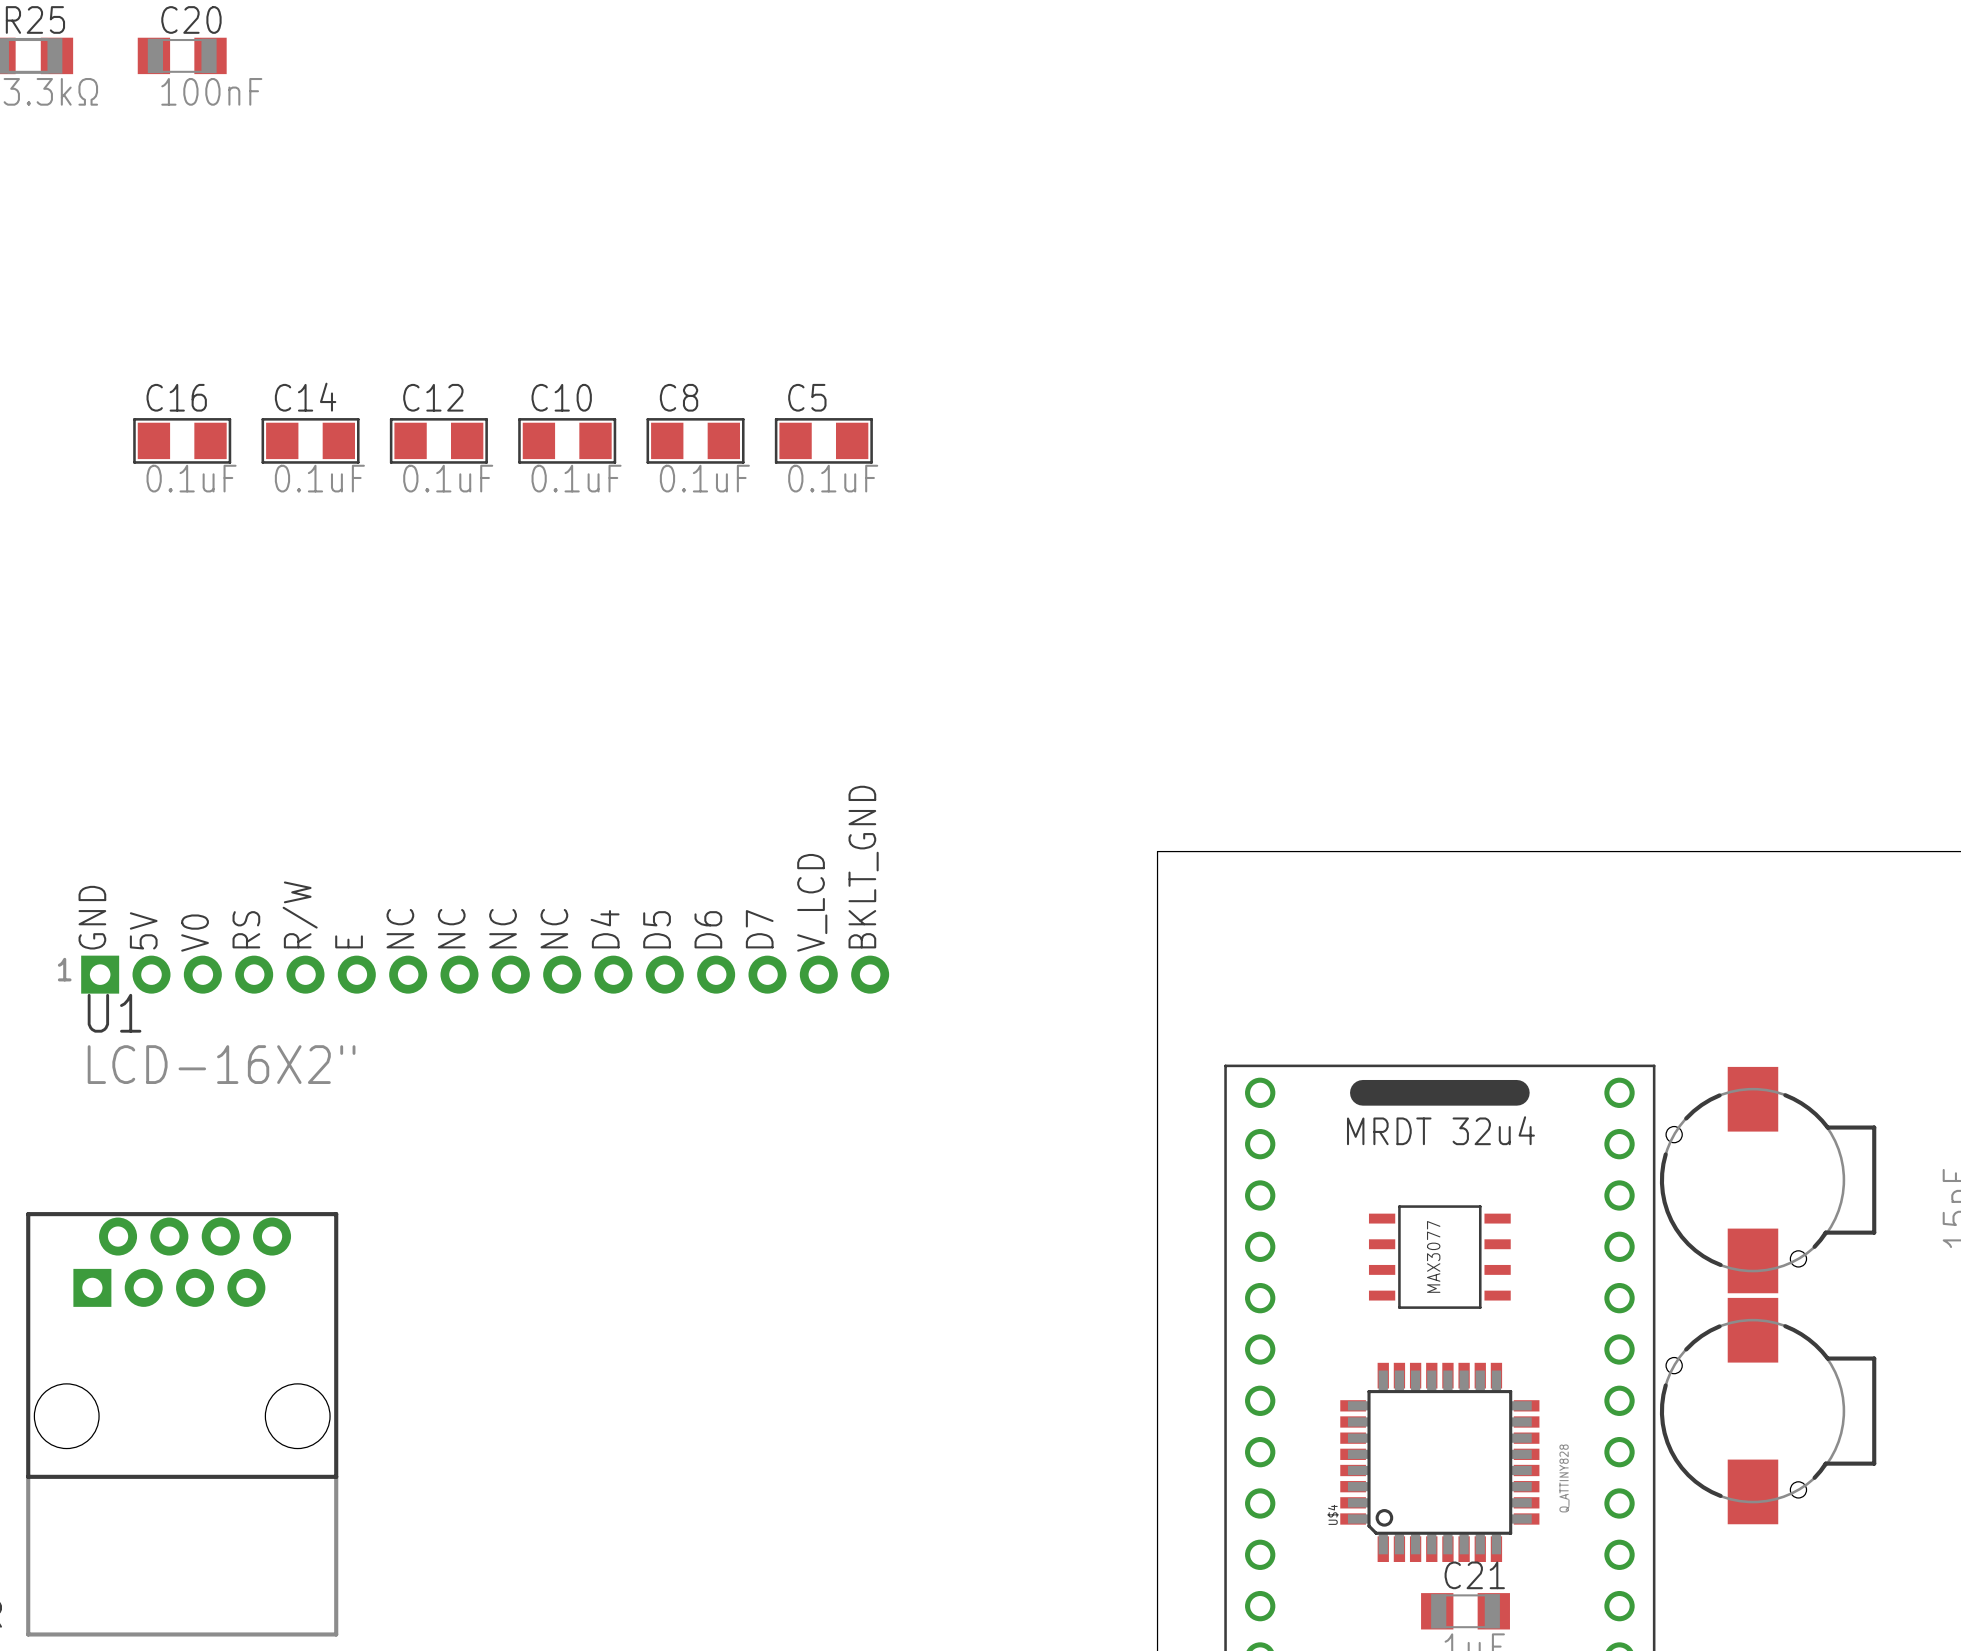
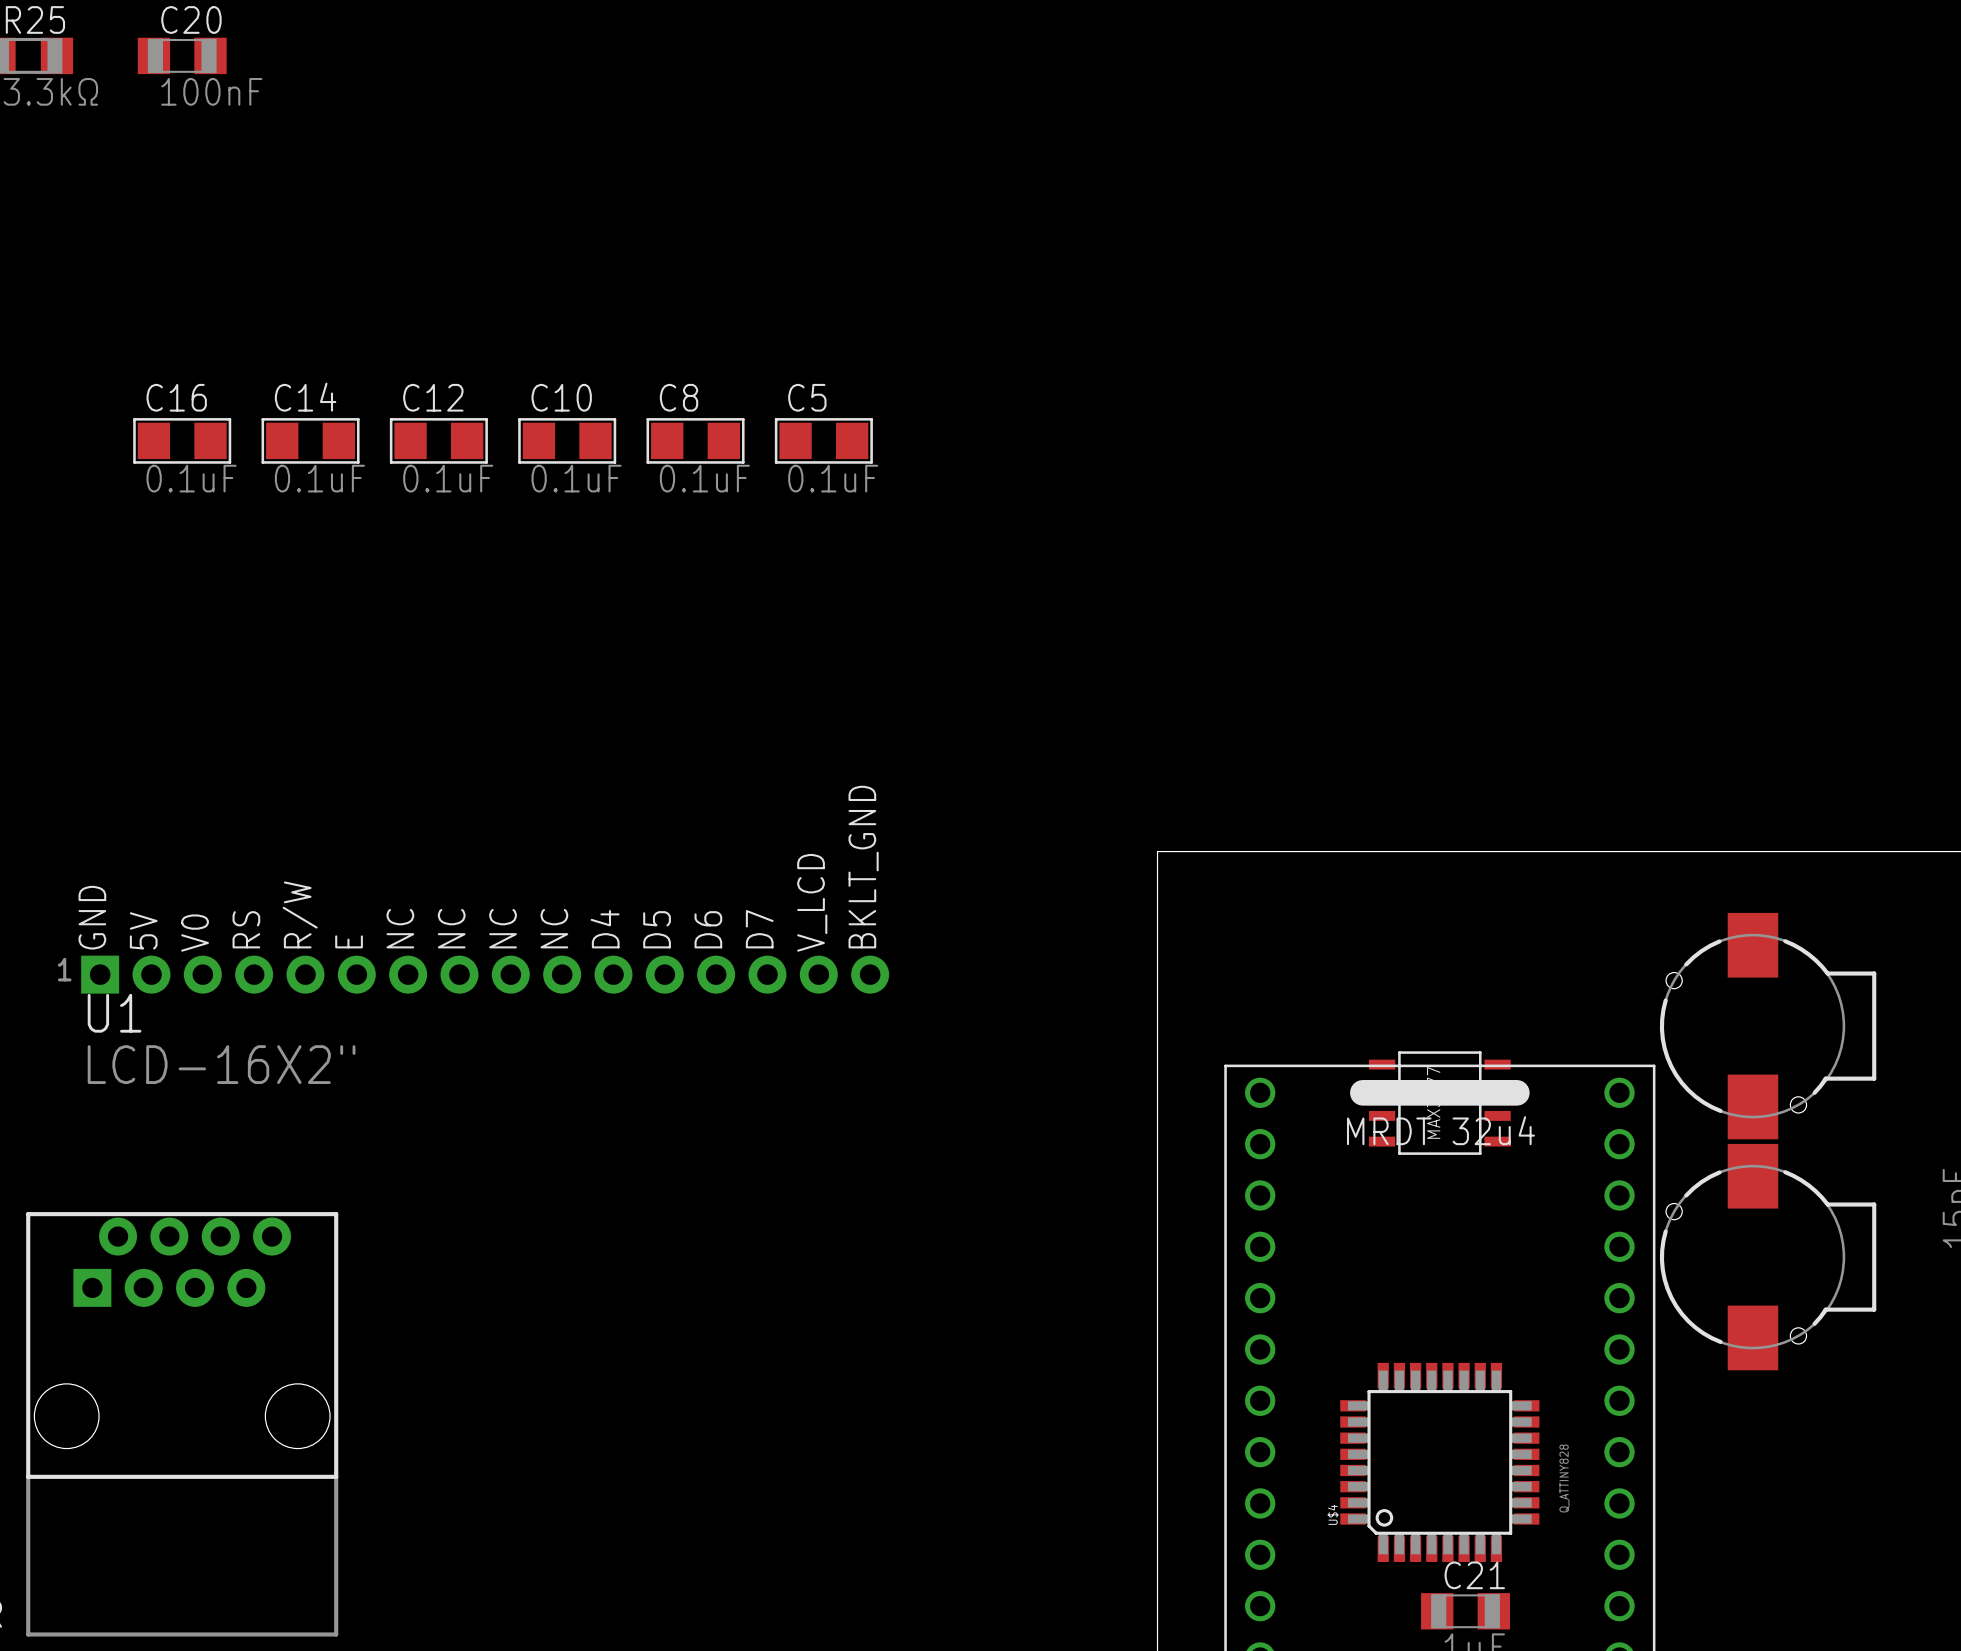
part: none -> (1768, 1026)
part: (1768, 1180) -> none
part position: (1439, 1257) -> (1439, 1103)
part: none -> (1768, 1257)
part: (1768, 1411) -> none

